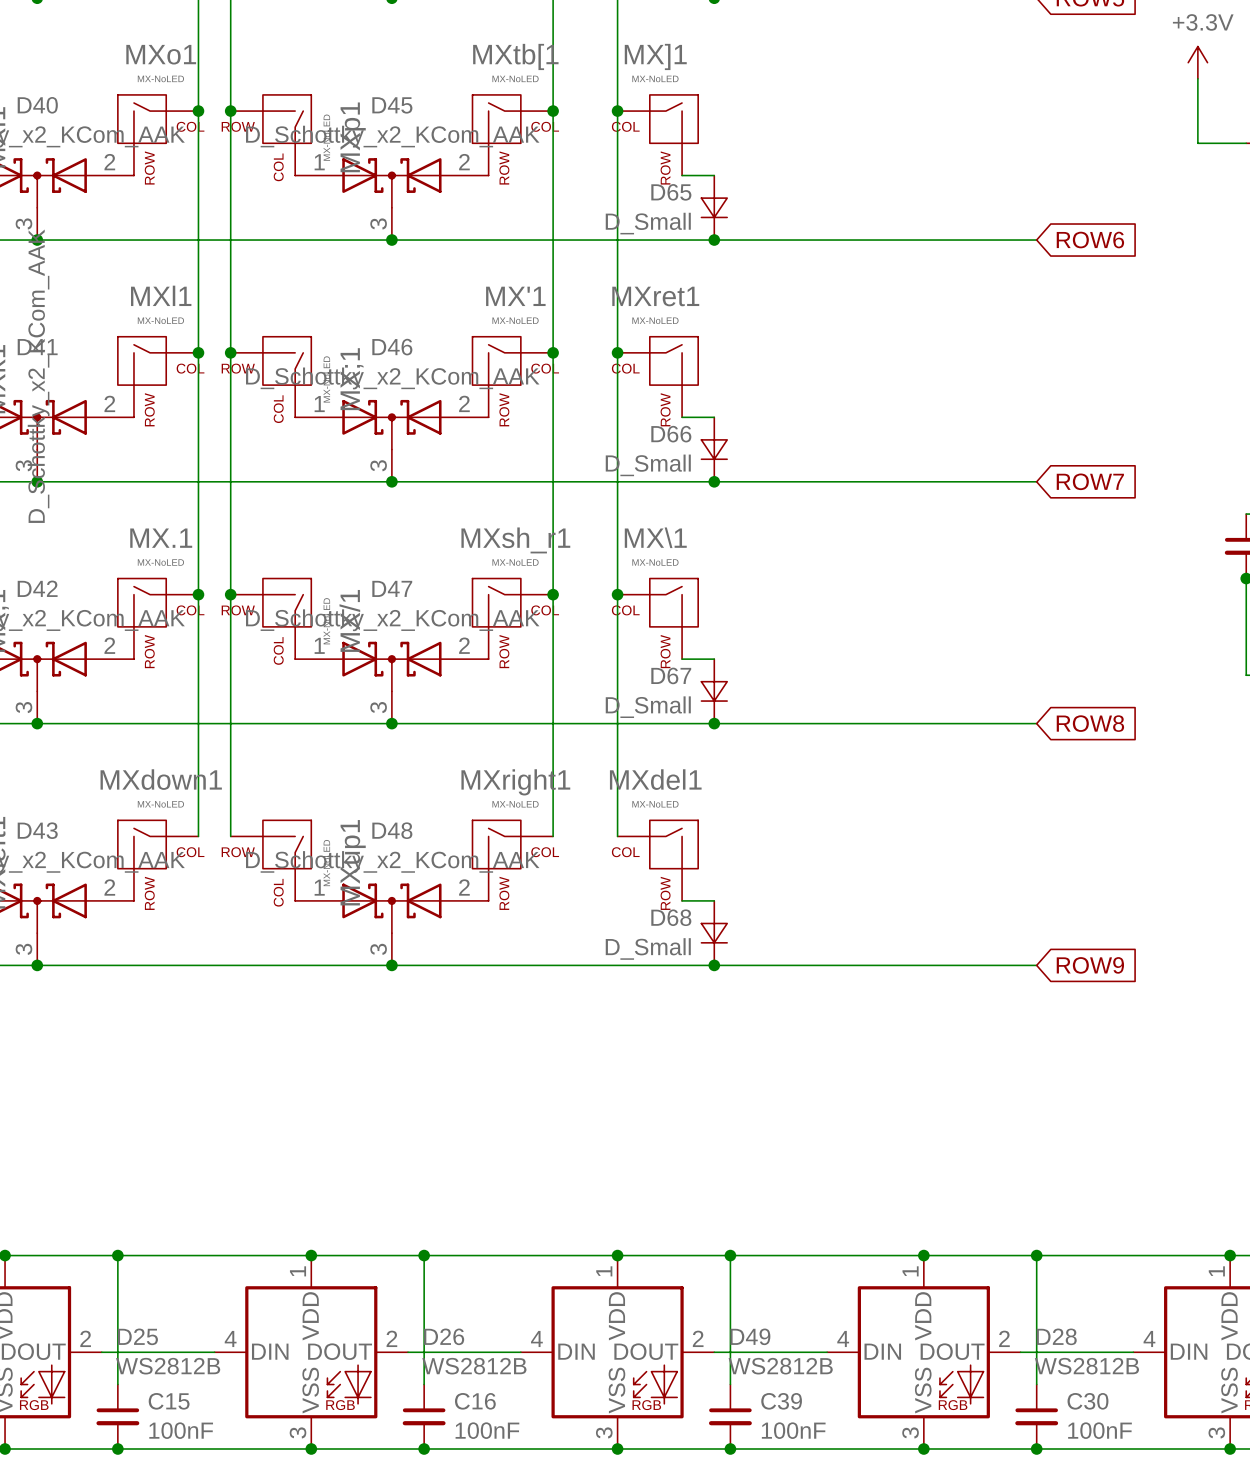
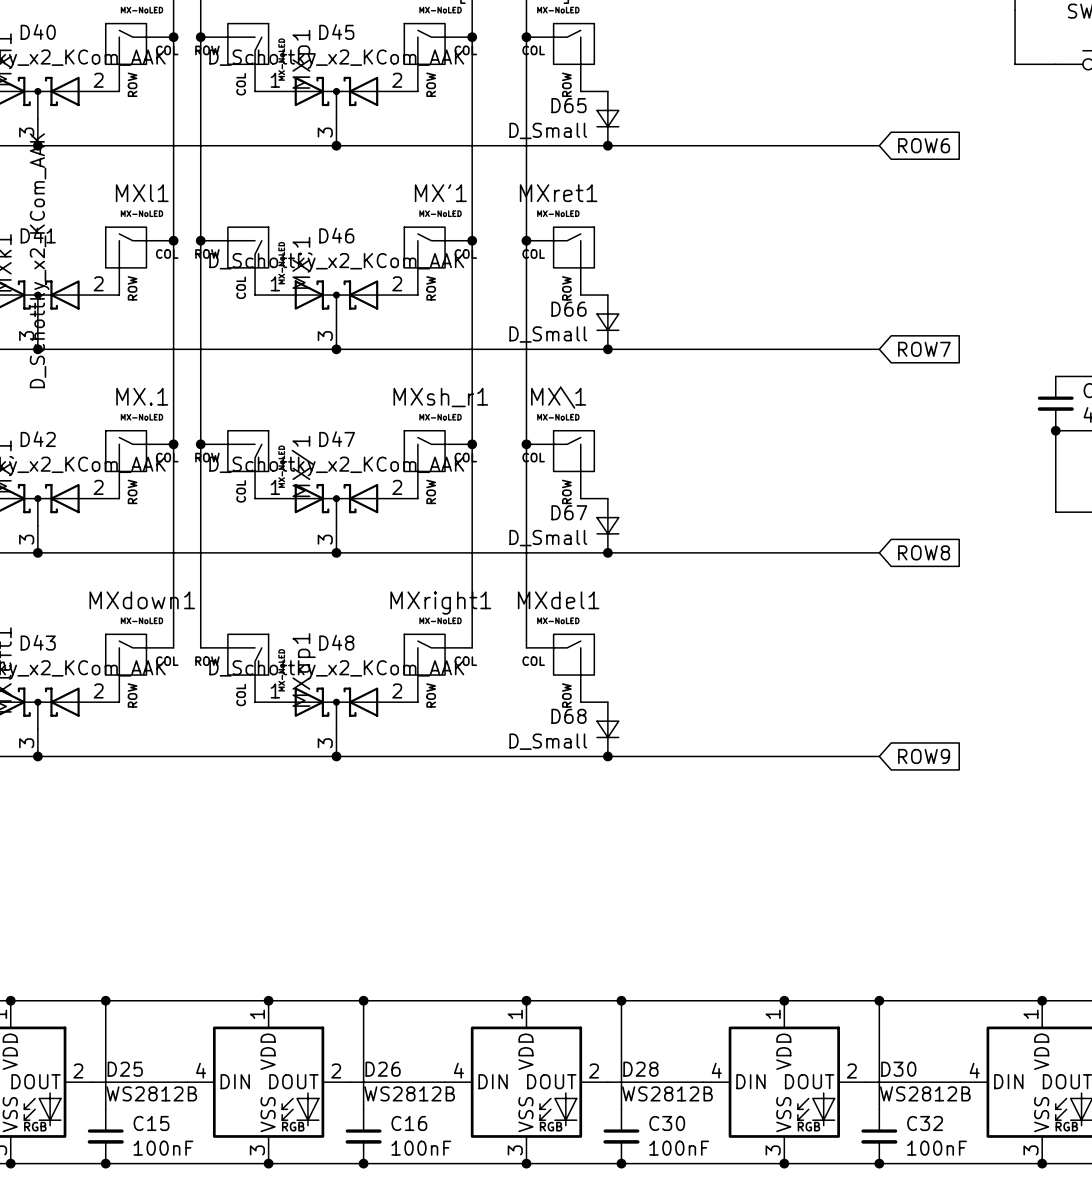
D49 name: D49 (750, 1336) -> D28 (640, 1069)
D28 name: D28 (1056, 1336) -> D30 (898, 1069)
C39 name: C39 (781, 1401) -> C30 (667, 1123)
C30 name: C30 (1087, 1401) -> C32 (925, 1123)

